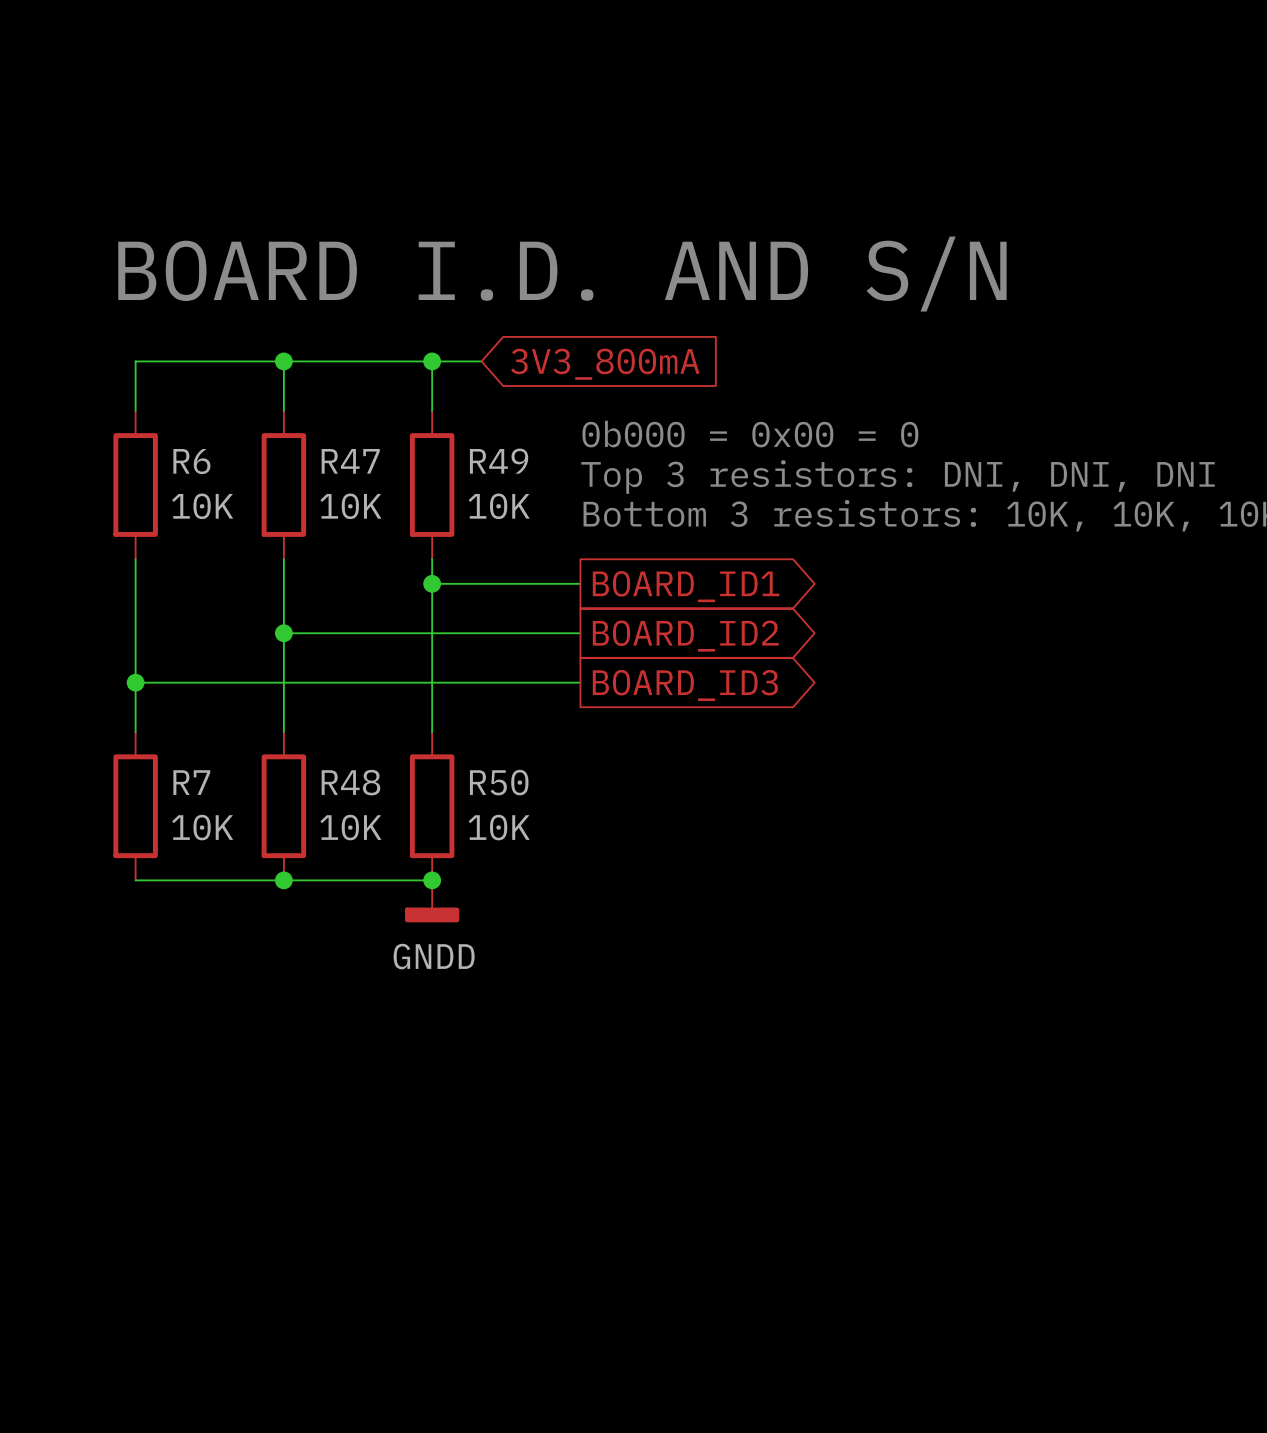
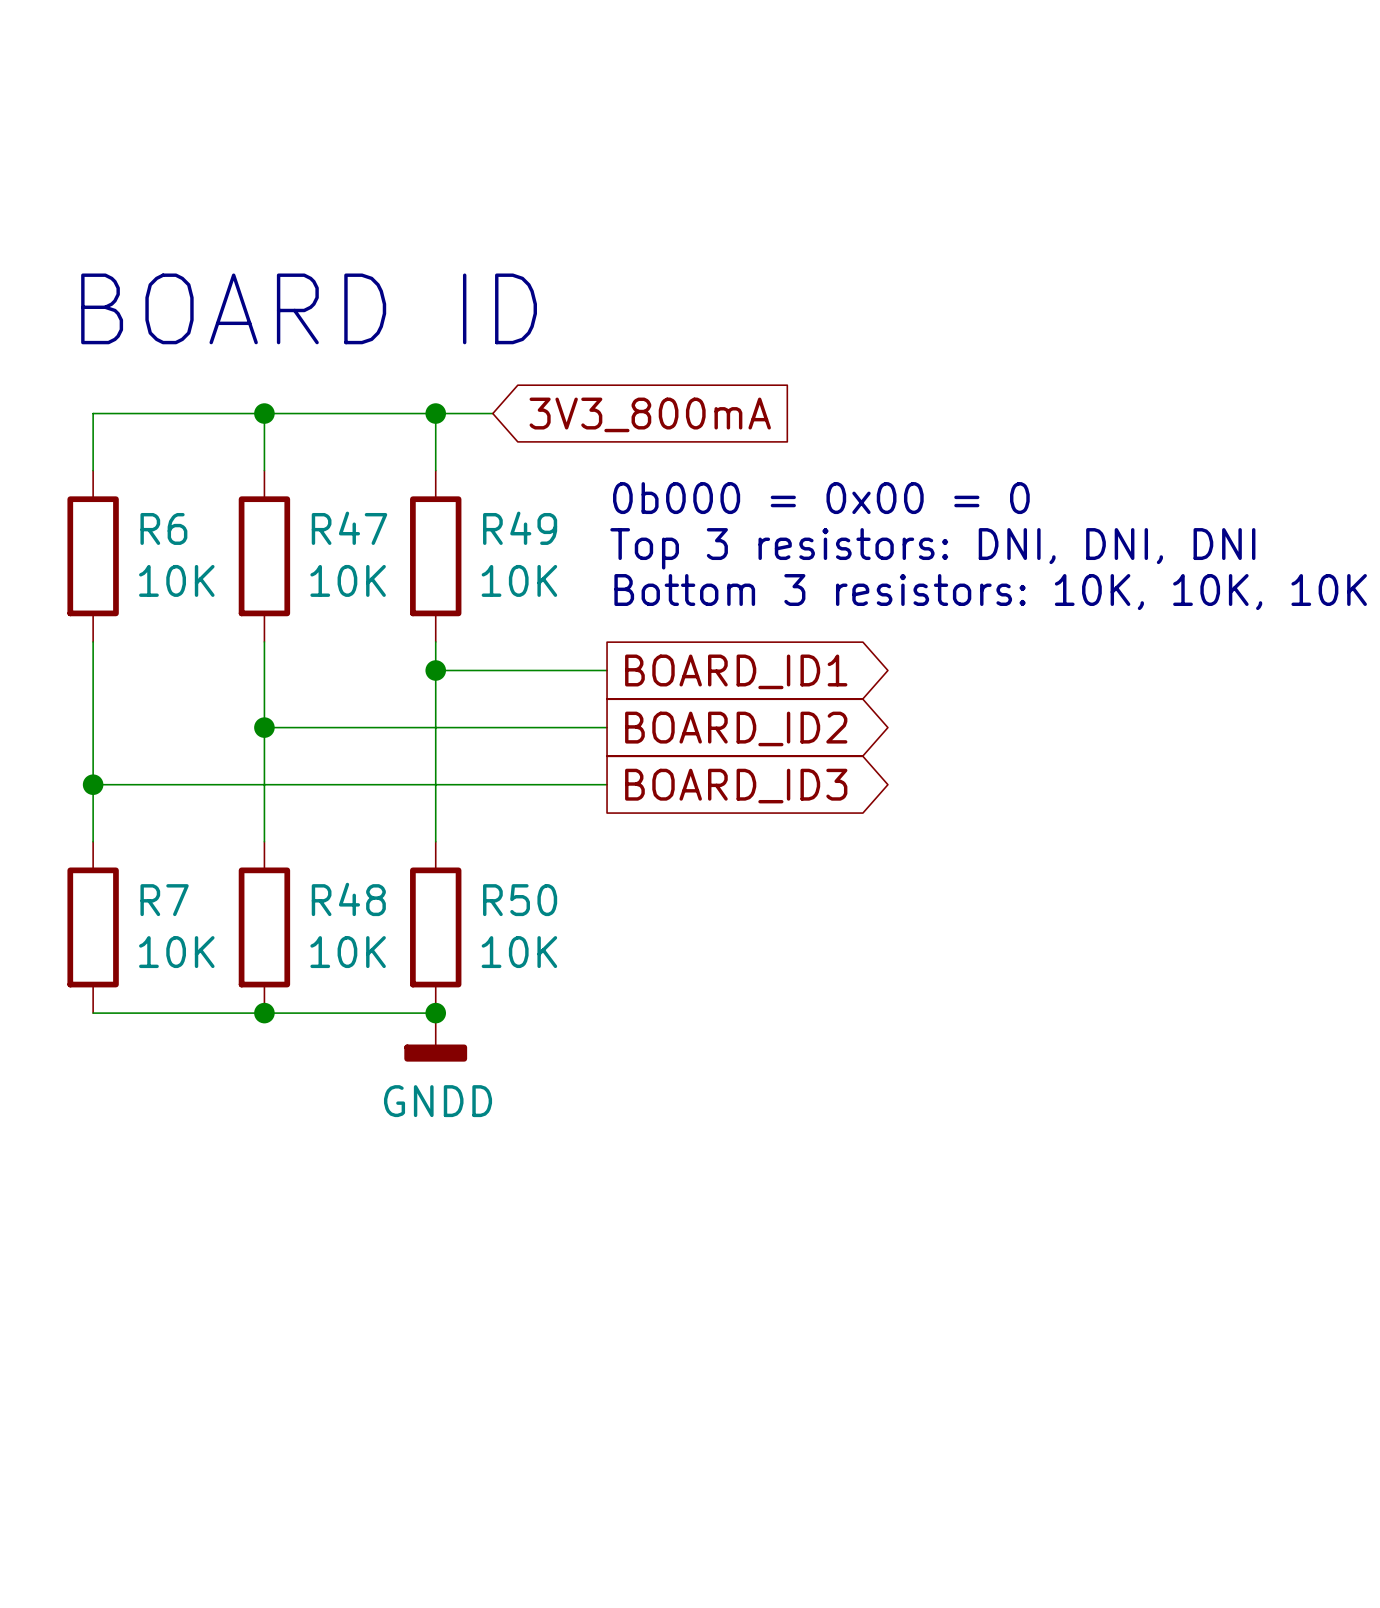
text: BOARD I.D. AND S/N (562, 274) -> BOARD ID (309, 308)

